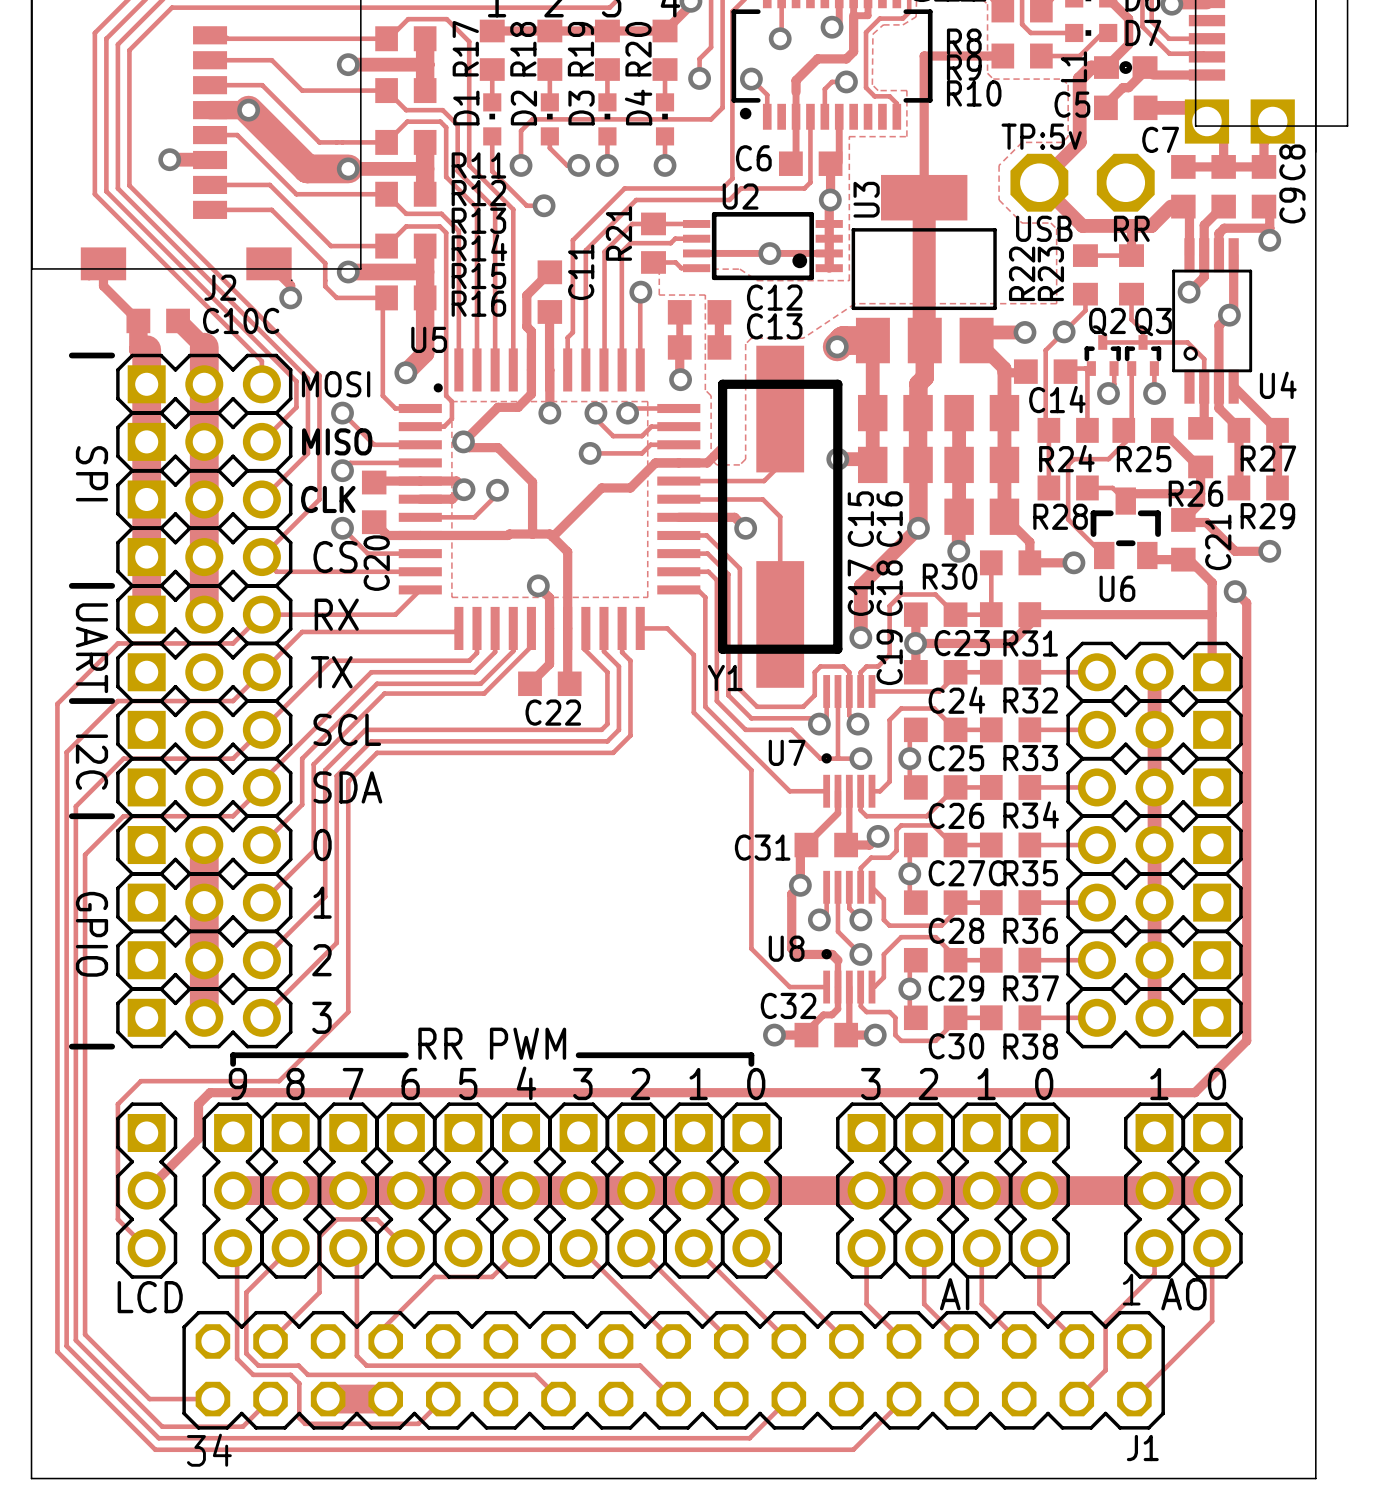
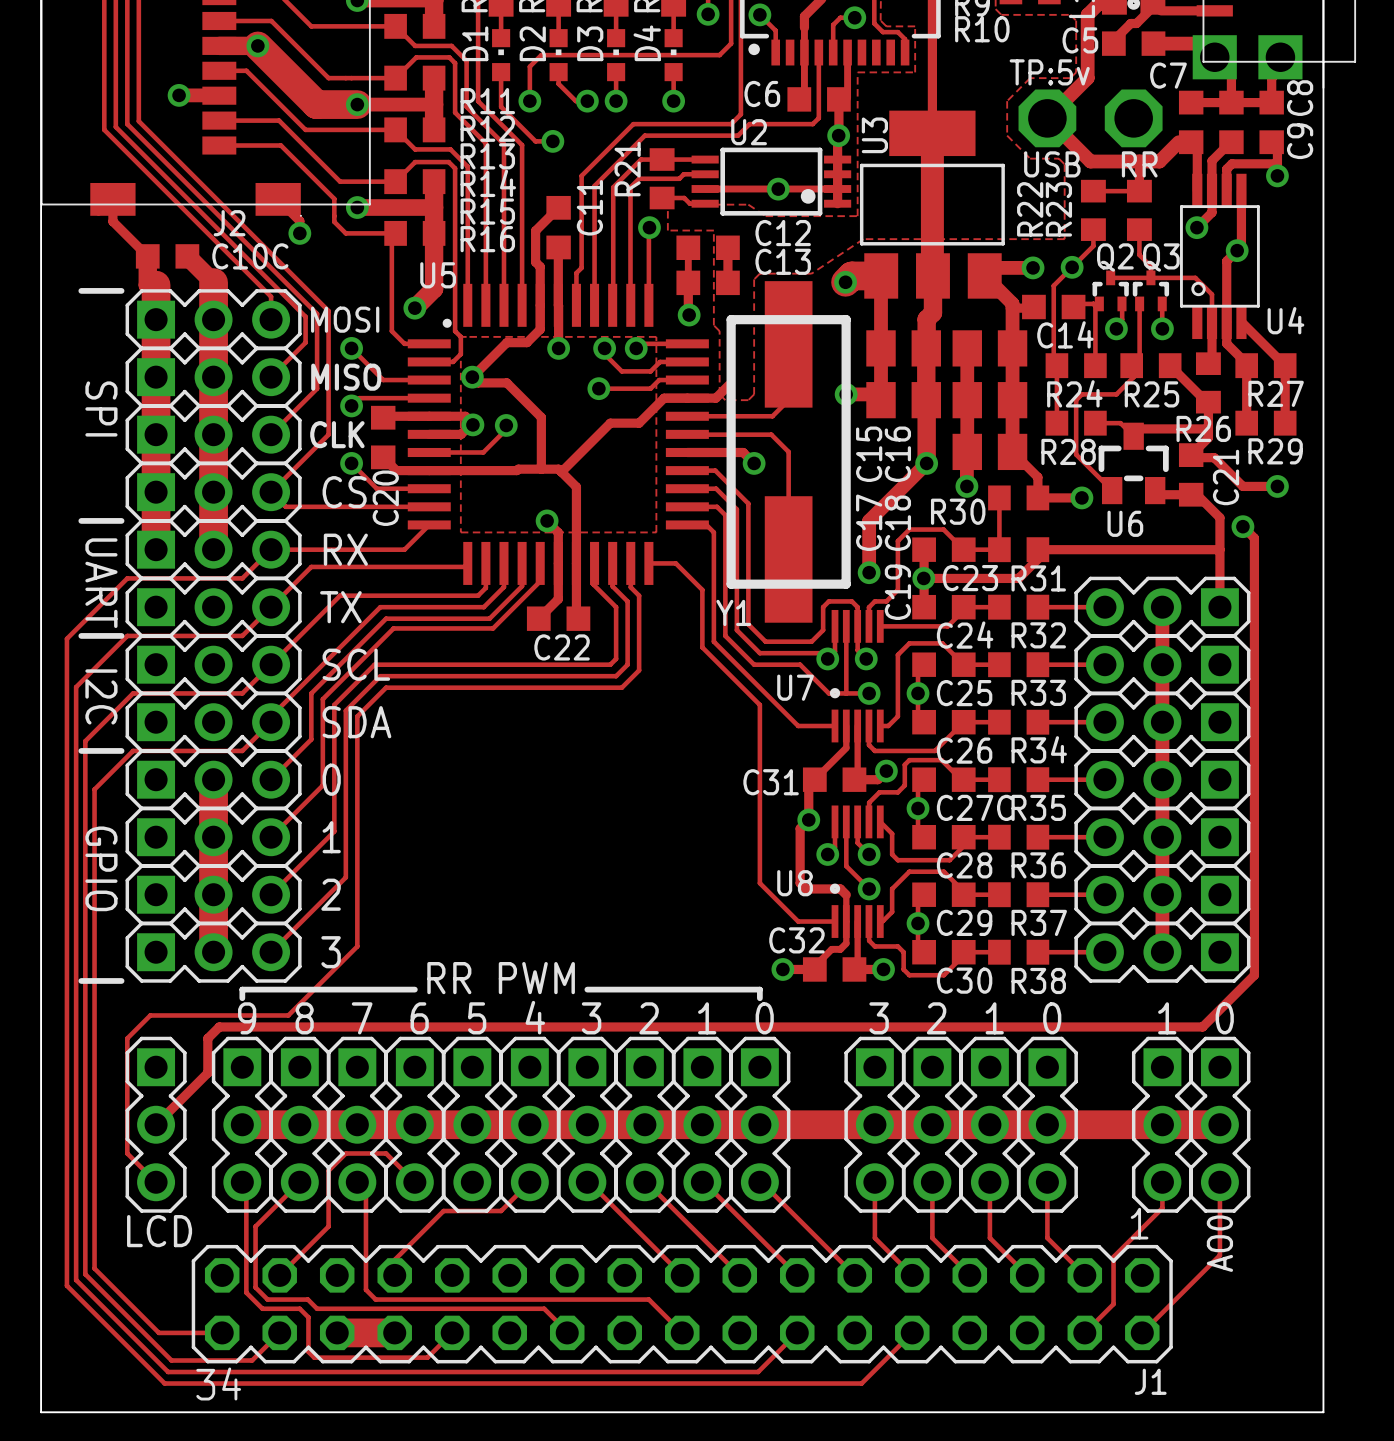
text: AI (954, 1294) -> none
text: AO (1183, 1294) -> none
part value: none -> AO0 (1219, 1243)

